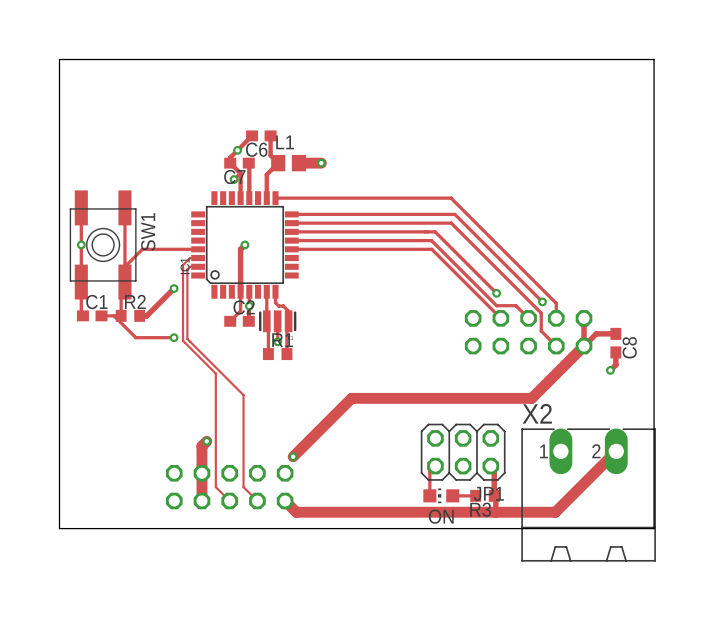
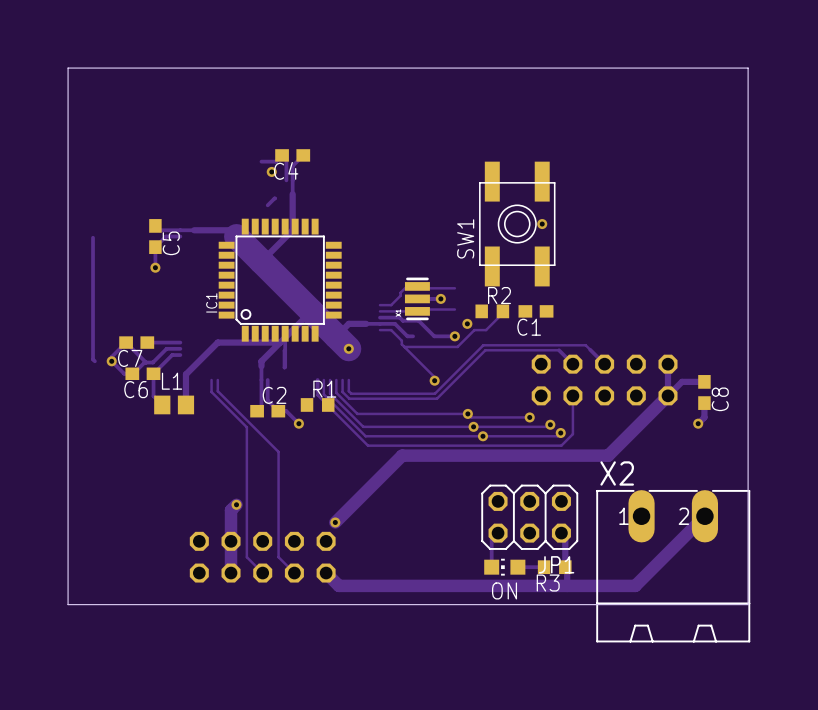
track: (252, 135) (230, 157) (230, 163) (240, 173) (240, 198) -> none
C4: none -> (292, 155)
C6 position: (261, 135) -> (142, 373)
track: none -> (303, 155) (292, 166) (292, 230) (261, 261)
track: (270, 135) (270, 155) (278, 163) (266, 174) (266, 198) -> none
track: none -> (261, 161) (275, 161) (282, 155) (286, 159) (286, 180)
C7 position: (239, 163) -> (136, 342)
track: (248, 163) (249, 198) -> none
L1 position: (288, 163) -> (174, 404)
track: (298, 163) (321, 163) -> none
via: (321, 163) -> none
via: (234, 179) -> none
via: none -> (542, 224)
track: none -> (155, 225) (159, 230) (230, 230) (348, 348)
track: (275, 198) (451, 198) (556, 303) (556, 318) -> none
C5: none -> (155, 236)
track: none -> (180, 236) (166, 236) (155, 247) (155, 267)
track: (124, 207) (124, 282) (121, 285) (121, 315) (101, 315) -> none
track: (291, 214) (454, 214) (542, 301) -> none
track: (291, 223) (451, 223) (541, 313) (541, 331) (556, 346) -> none
SW1 name position: SW1 (148, 231) -> SW1 (465, 238)
track: (291, 231) (435, 231) (496, 293) -> none
via: none -> (155, 267)
track: (291, 240) (431, 240) (496, 305) (515, 305) -> (348, 380) (348, 391) (351, 393) (434, 393) (483, 345) (585, 345) (590, 349)
via: (81, 244) -> none
SW1 position: (103, 244) -> (517, 224)
track: (244, 244) (240, 249) (240, 310) (230, 321) -> none
via: (244, 244) -> none
track: (198, 249) (142, 249) (124, 266) -> none
track: (291, 249) (431, 249) (488, 306) -> (342, 380) (342, 392) (349, 398) (436, 398) (485, 350) (559, 350)
track: none -> (454, 288) (406, 286) (391, 305) (380, 305)
track: (198, 258) (190, 258) (183, 265) (183, 340) (184, 342) -> (211, 380) (211, 392)
via: none -> (440, 298)
track: (198, 266) (190, 266) (187, 269) (187, 338) (190, 341) -> (217, 380) (217, 391)
track: none -> (454, 309) (380, 311)
track: none -> (311, 311) (261, 361) (261, 406) (257, 411)
track: none -> (502, 311) (486, 330) (474, 330) (457, 346) (404, 346)
track: none -> (380, 317) (399, 317) (402, 320) (418, 320) (434, 336) (454, 336)
via: none -> (467, 323)
track: (174, 288) (146, 315) (139, 315) -> none
via: (174, 288) -> none
track: none -> (380, 330) (391, 330) (401, 340) (401, 344) (434, 377) (434, 380)
track: (266, 291) (268, 354) -> none
track: (275, 291) (275, 302) (278, 306) (283, 306) (288, 311) (286, 354) -> none
via: (496, 293) -> none
track: none -> (336, 336) (348, 323) (394, 323) (407, 336) (413, 336)
via: none -> (454, 336)
track: none -> (147, 342) (180, 342)
track: none -> (280, 342) (217, 342) (185, 374) (185, 404)
via: (542, 301) -> none
C1 name position: C1 (96, 302) -> C1 (529, 327)
track: none -> (180, 348) (166, 348) (152, 362) (144, 362) (133, 373) (124, 373) (111, 361) (111, 356) (126, 342) (146, 362)
via: none -> (348, 348)
via: (249, 306) -> none
track: none -> (180, 355) (172, 355) (153, 373) (153, 396) (162, 404)
C1 position: (92, 315) -> (535, 311)
via: none -> (111, 361)
track: (114, 315) (135, 337) (174, 337) -> none
R2 position: (130, 315) -> (492, 311)
C2 position: (239, 321) -> (267, 411)
part rotation: 0° (277, 321) -> 90° clockwise (417, 298)
part position: (277, 321) -> (417, 298)
track: none -> (267, 380) (267, 400) (278, 411) (286, 411) (298, 423)
track: none -> (323, 380) (323, 394) (365, 436) (557, 436) (560, 433)
track: none -> (330, 380) (330, 393) (363, 426) (548, 426) (550, 424)
track: none -> (336, 380) (336, 392) (357, 413) (467, 413) (471, 417) (529, 417)
via: none -> (434, 380)
via: (174, 337) -> none
track: none -> (317, 390) (317, 395) (368, 445) (561, 445) (572, 434) (572, 395)
via: (277, 341) -> none
via: none -> (467, 413)
via: none -> (529, 417)
via: none -> (298, 423)
via: none -> (550, 424)
via: none -> (473, 426)
via: none -> (560, 433)
via: none -> (482, 436)

